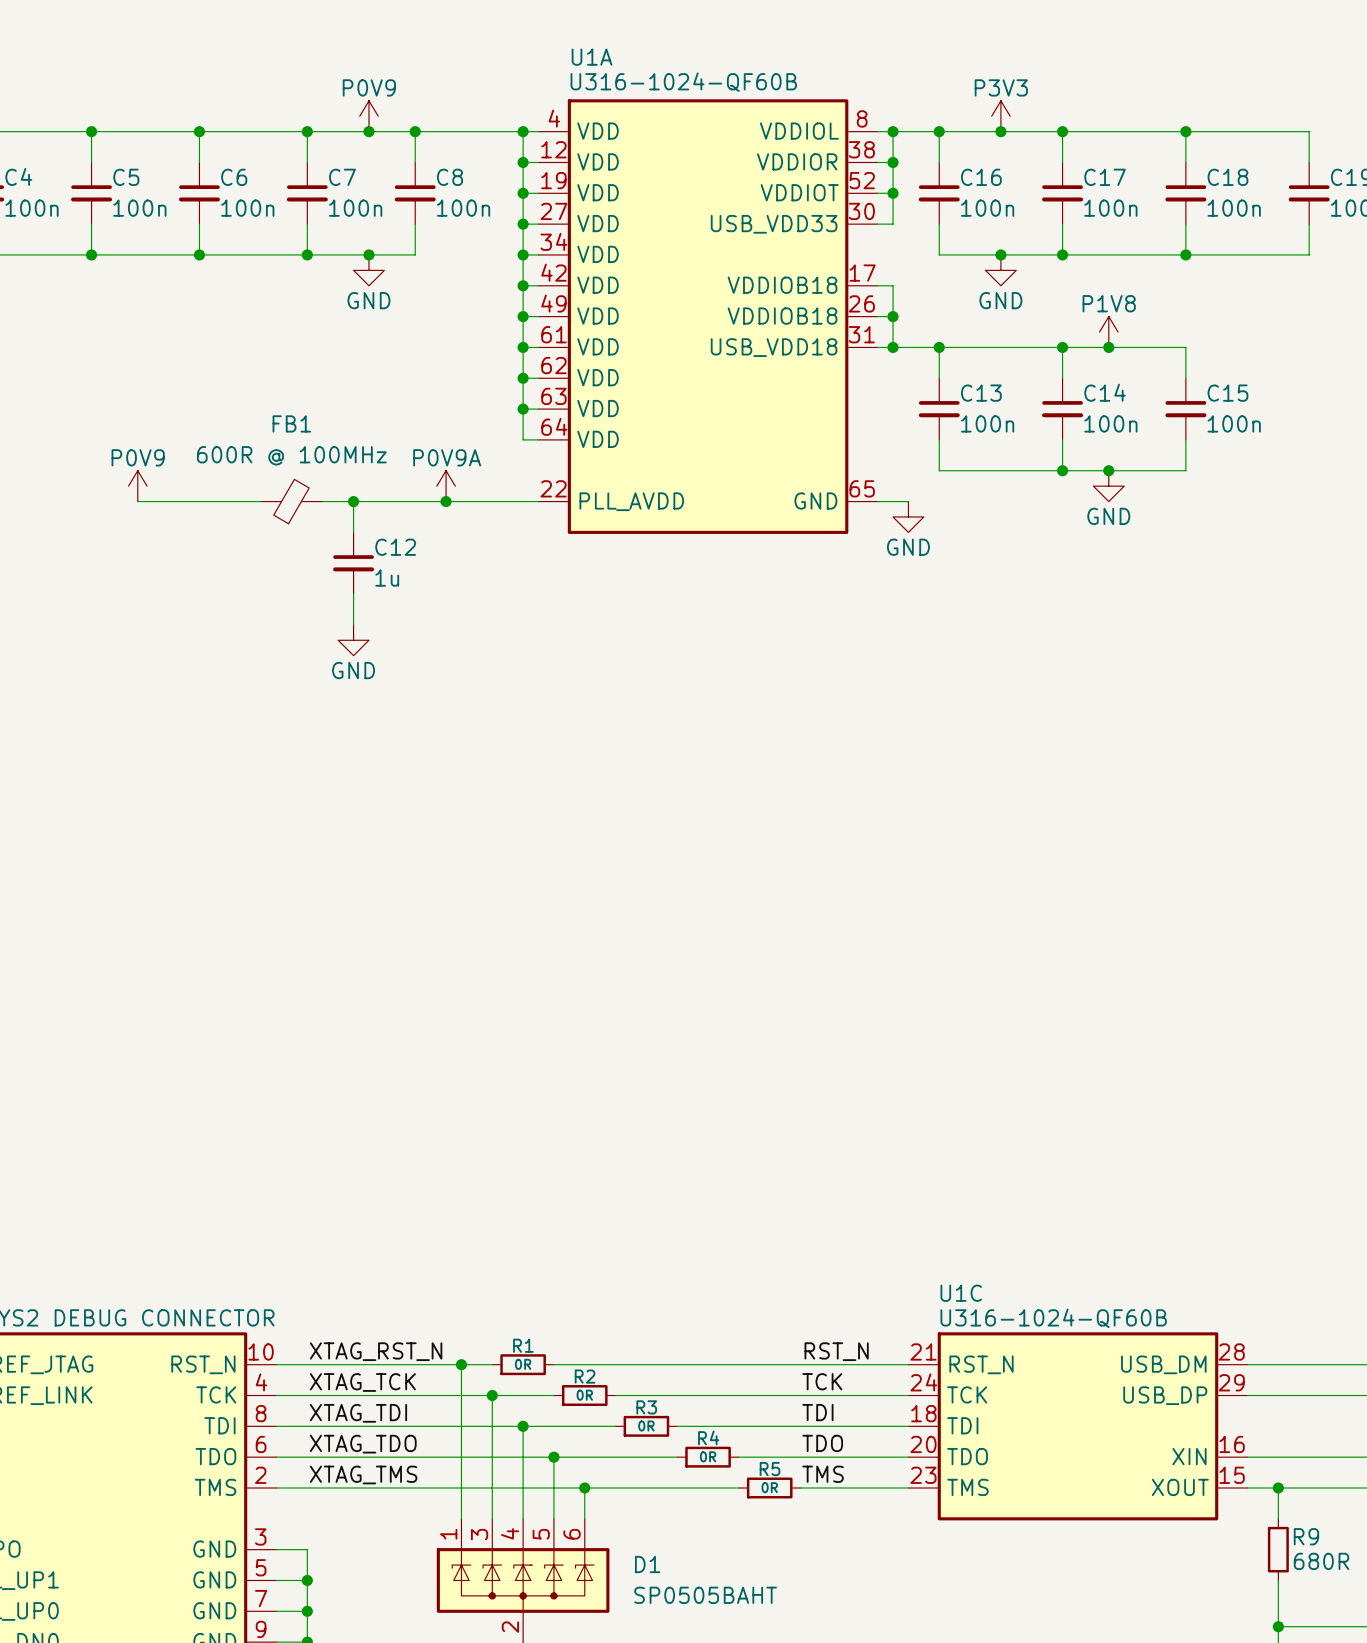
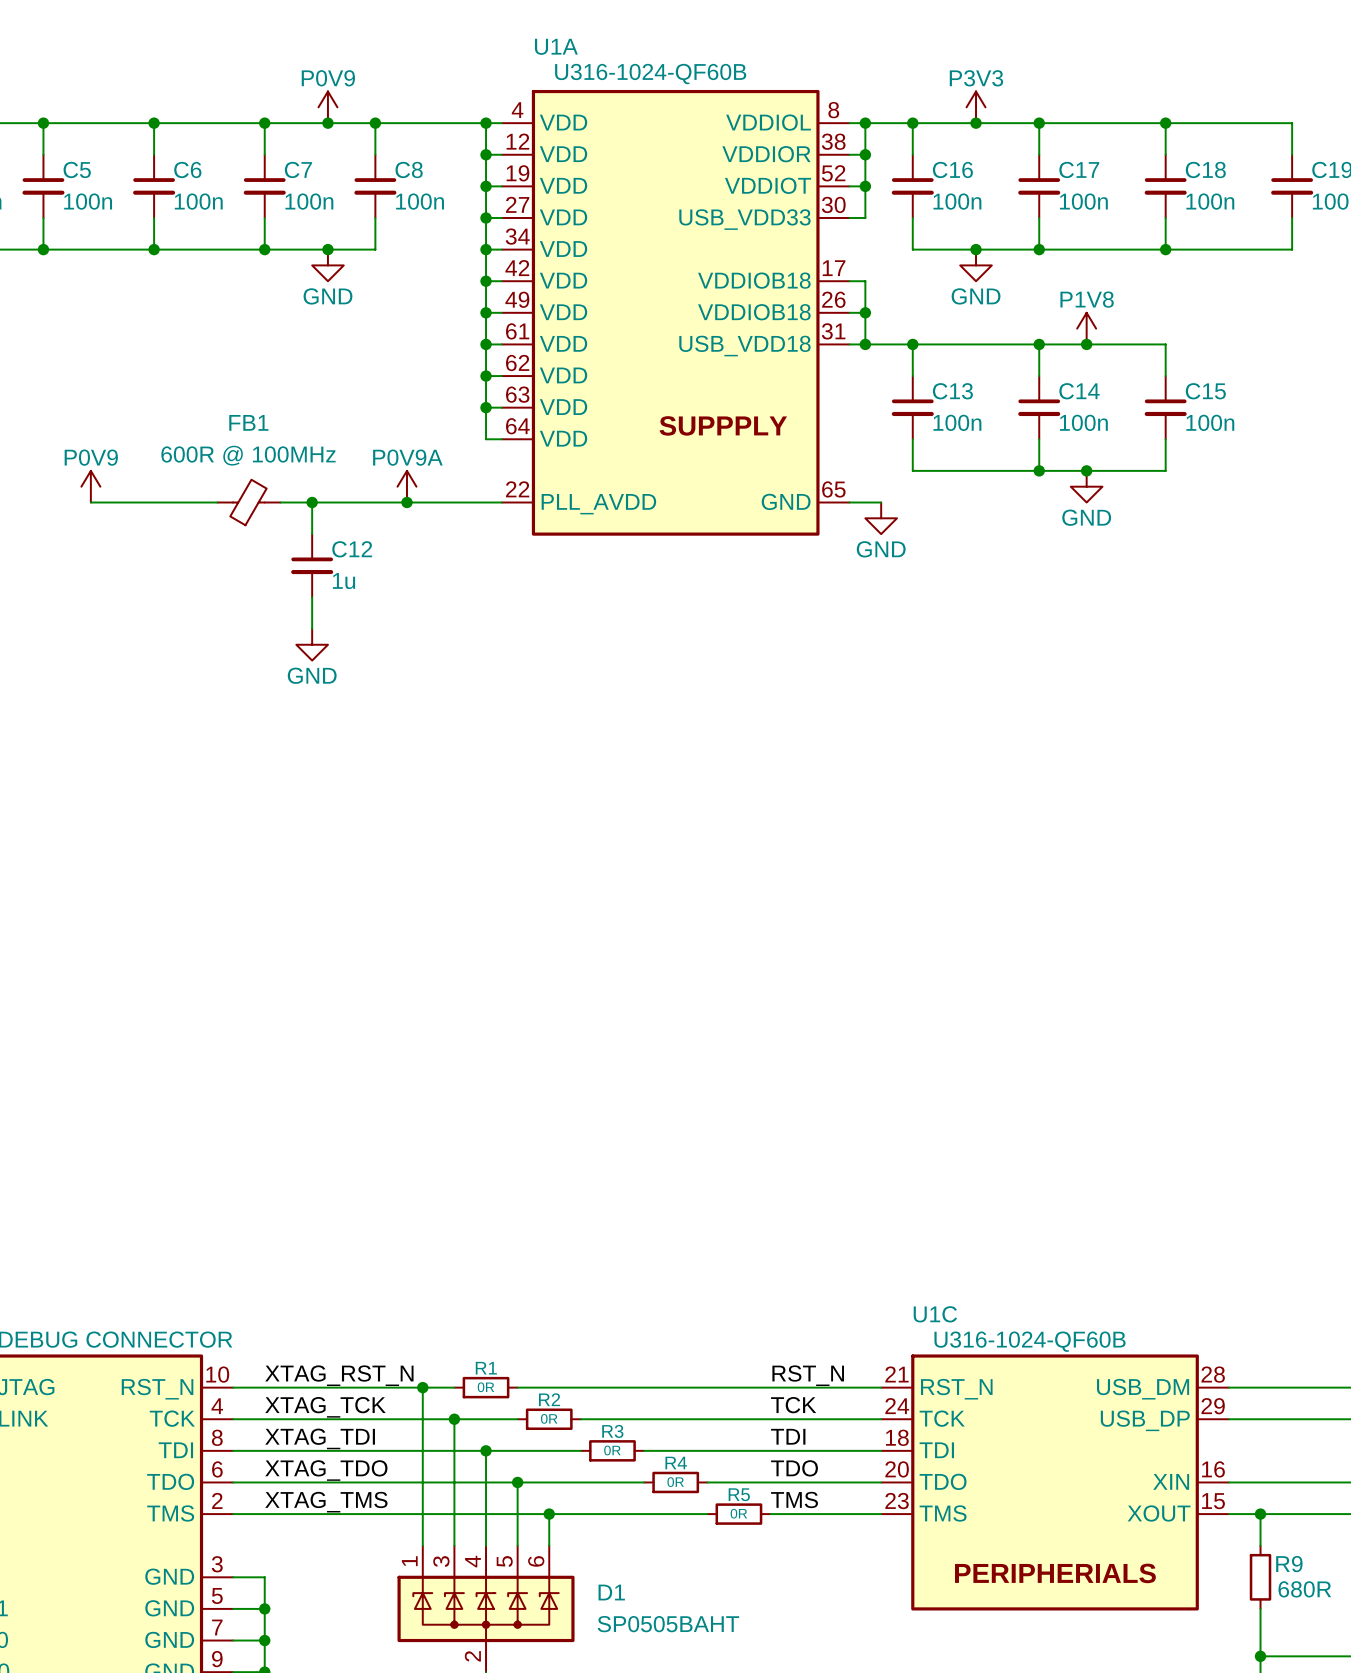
U1A text: none -> SUPPPLY (723, 425)
U1C symbol: [908, 1332, 1248, 1521] -> [881, 1354, 1229, 1611]

